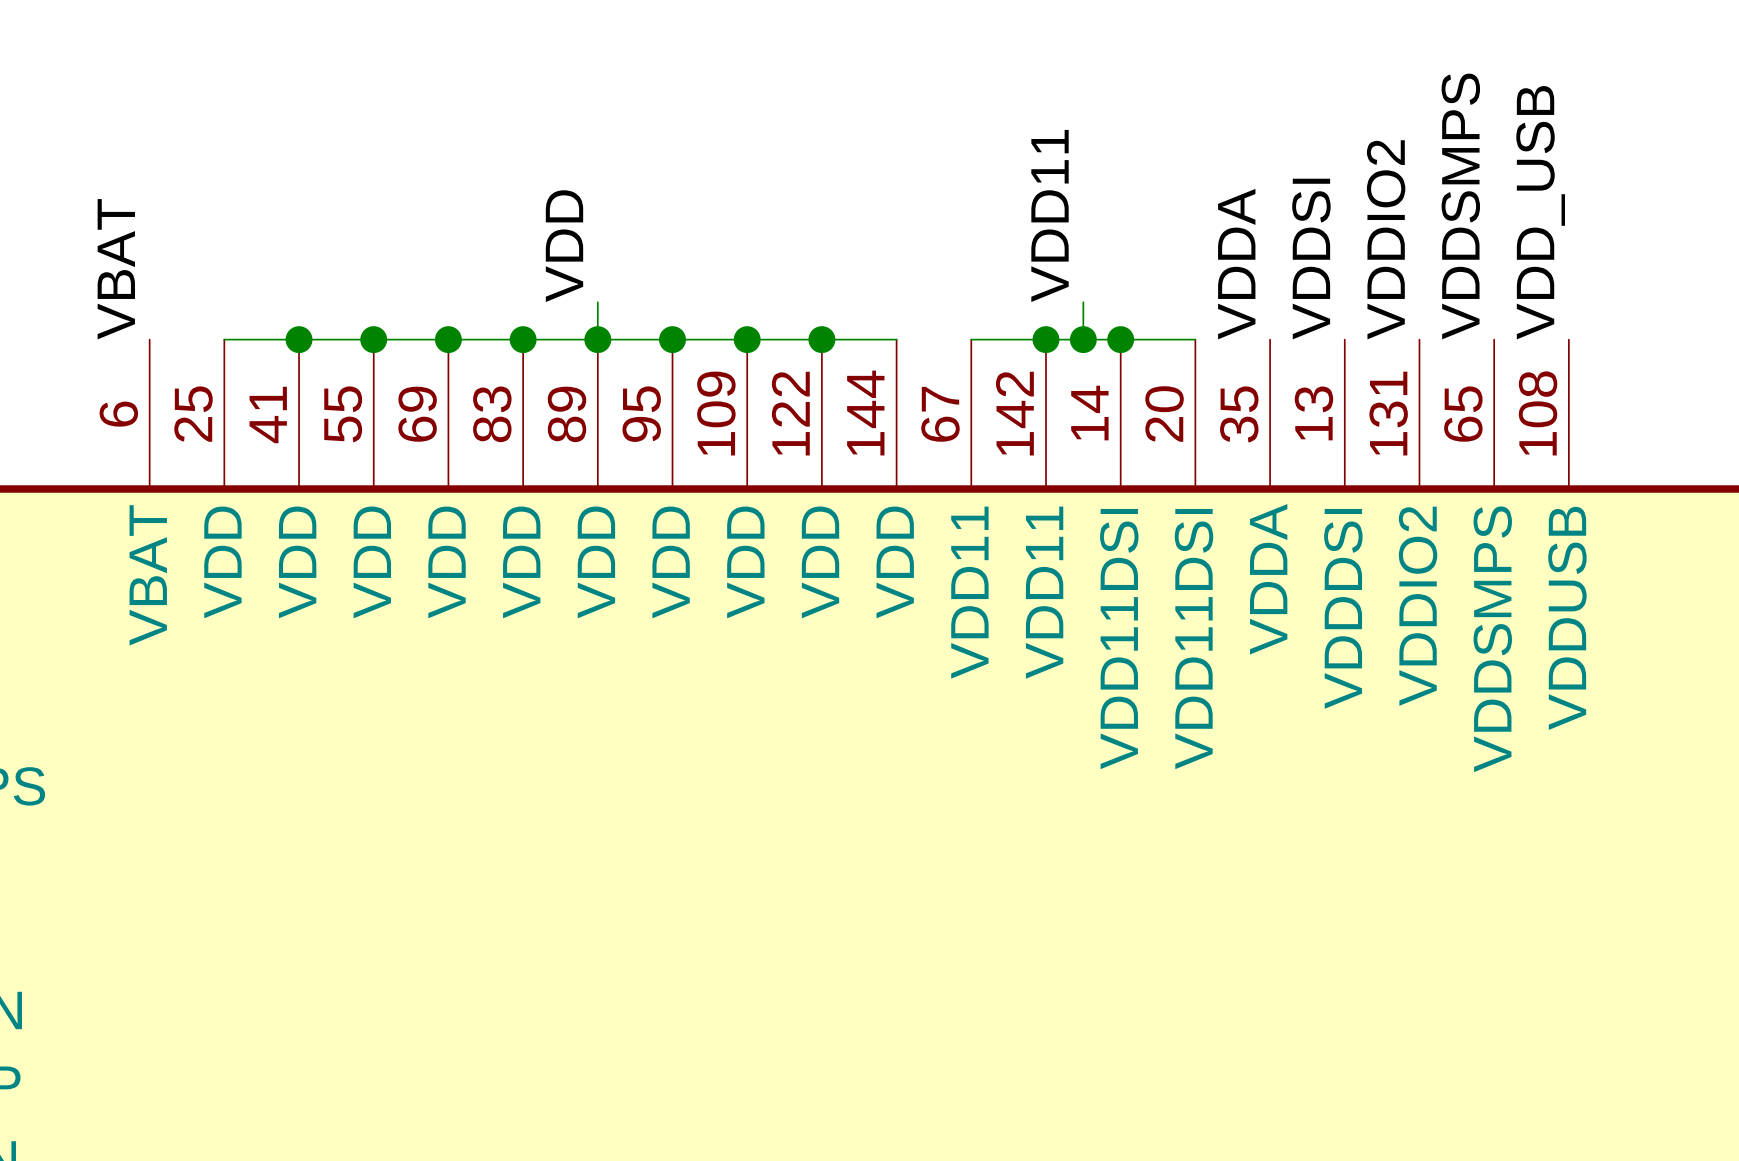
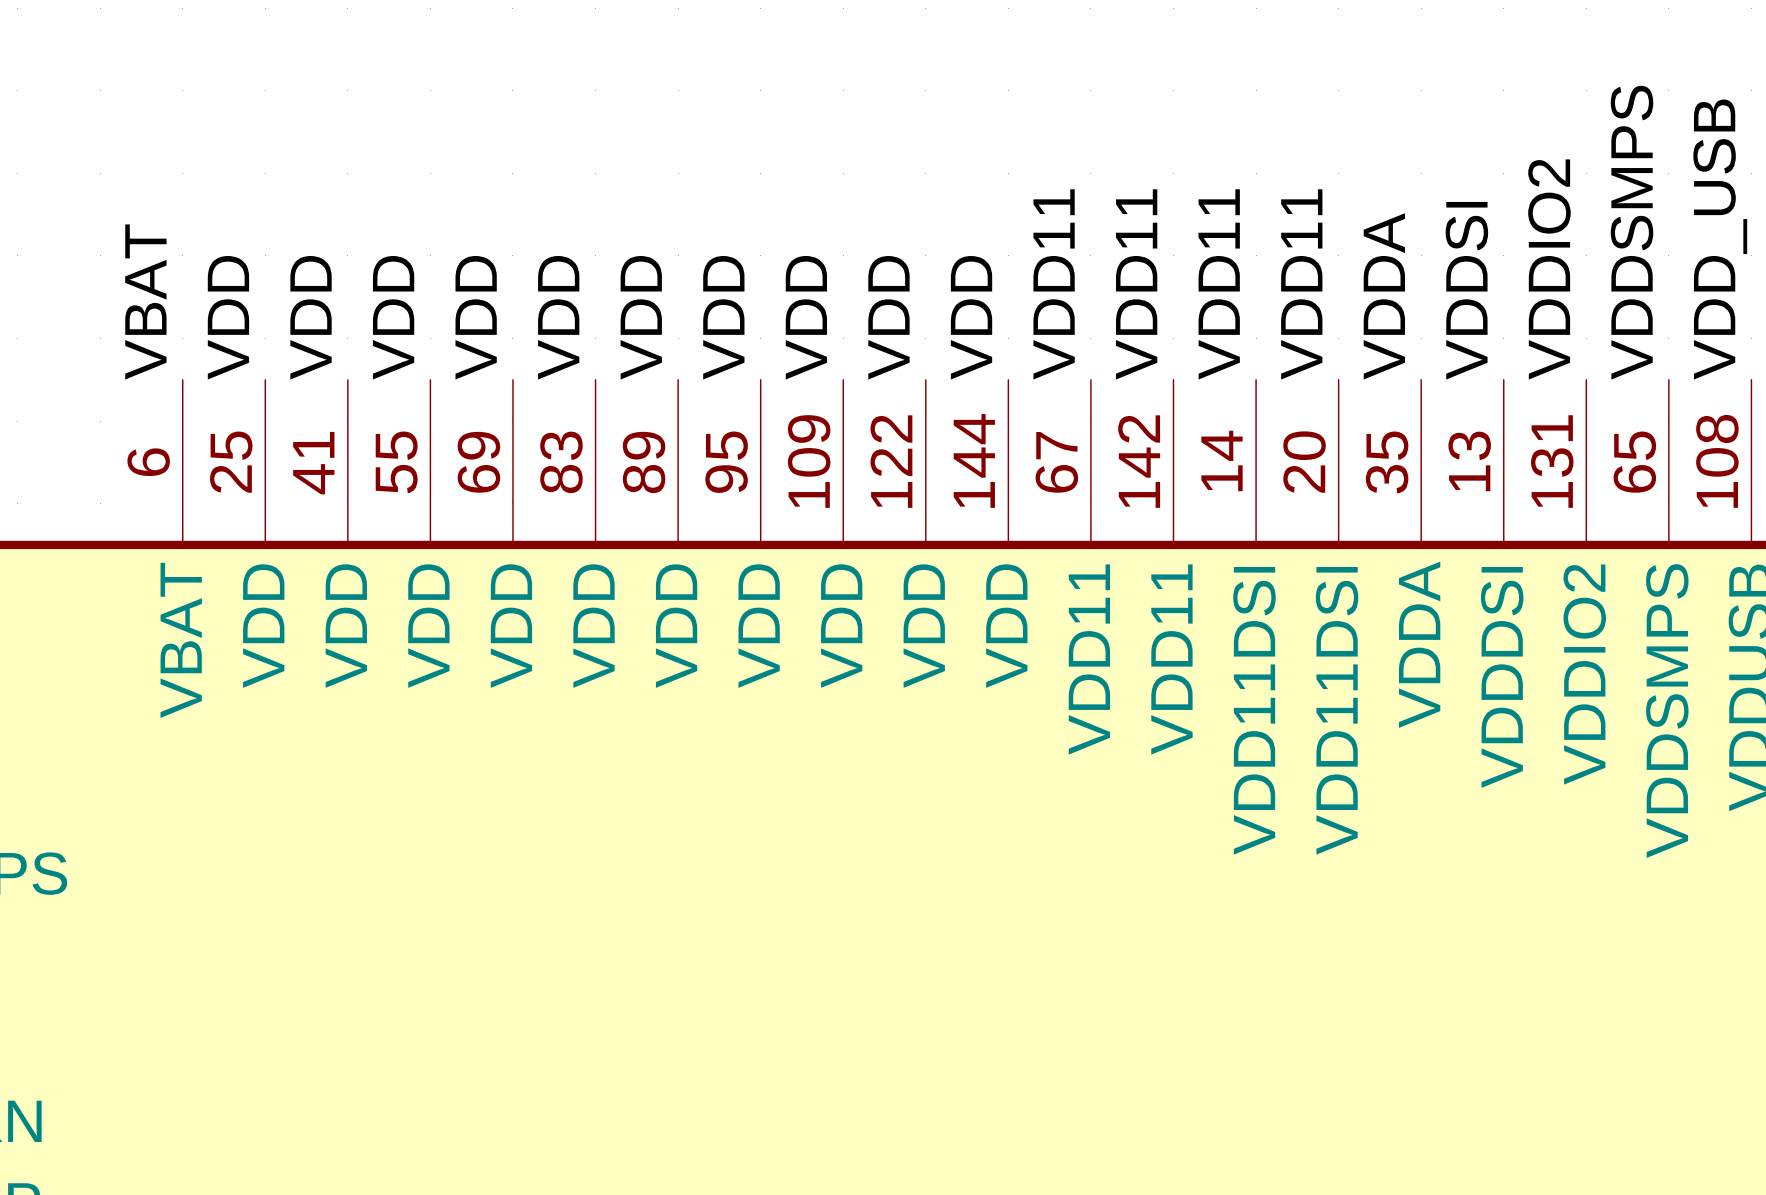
label: VDD11 (1050, 215) -> none
label position: VDD (564, 246) -> VDD (641, 317)
label: none -> VDD11 (1054, 284)
label: none -> VDD11 (1136, 284)
label: none -> VDD11 (1219, 284)
label: none -> VDD11 (1301, 284)
label: none -> VDD (228, 317)
label: none -> VDD (311, 317)
label: none -> VDD (393, 317)
label: none -> VDD (476, 317)
label: none -> VDD (558, 317)
label: none -> VDD (723, 317)
label: none -> VDD (806, 317)
label: none -> VDD (888, 317)
label: none -> VDD (971, 317)
wire: (597, 302) (597, 339) -> none
wire: (1083, 302) (1083, 339) -> none
wire: (224, 339) (896, 339) -> none
junction: (299, 339) -> none
junction: (373, 339) -> none
junction: (448, 339) -> none
junction: (523, 339) -> none
junction: (597, 339) -> none
junction: (672, 339) -> none
junction: (747, 339) -> none
junction: (821, 339) -> none
wire: (971, 339) (1195, 339) -> none
junction: (1045, 339) -> none
junction: (1083, 339) -> none
junction: (1120, 339) -> none

